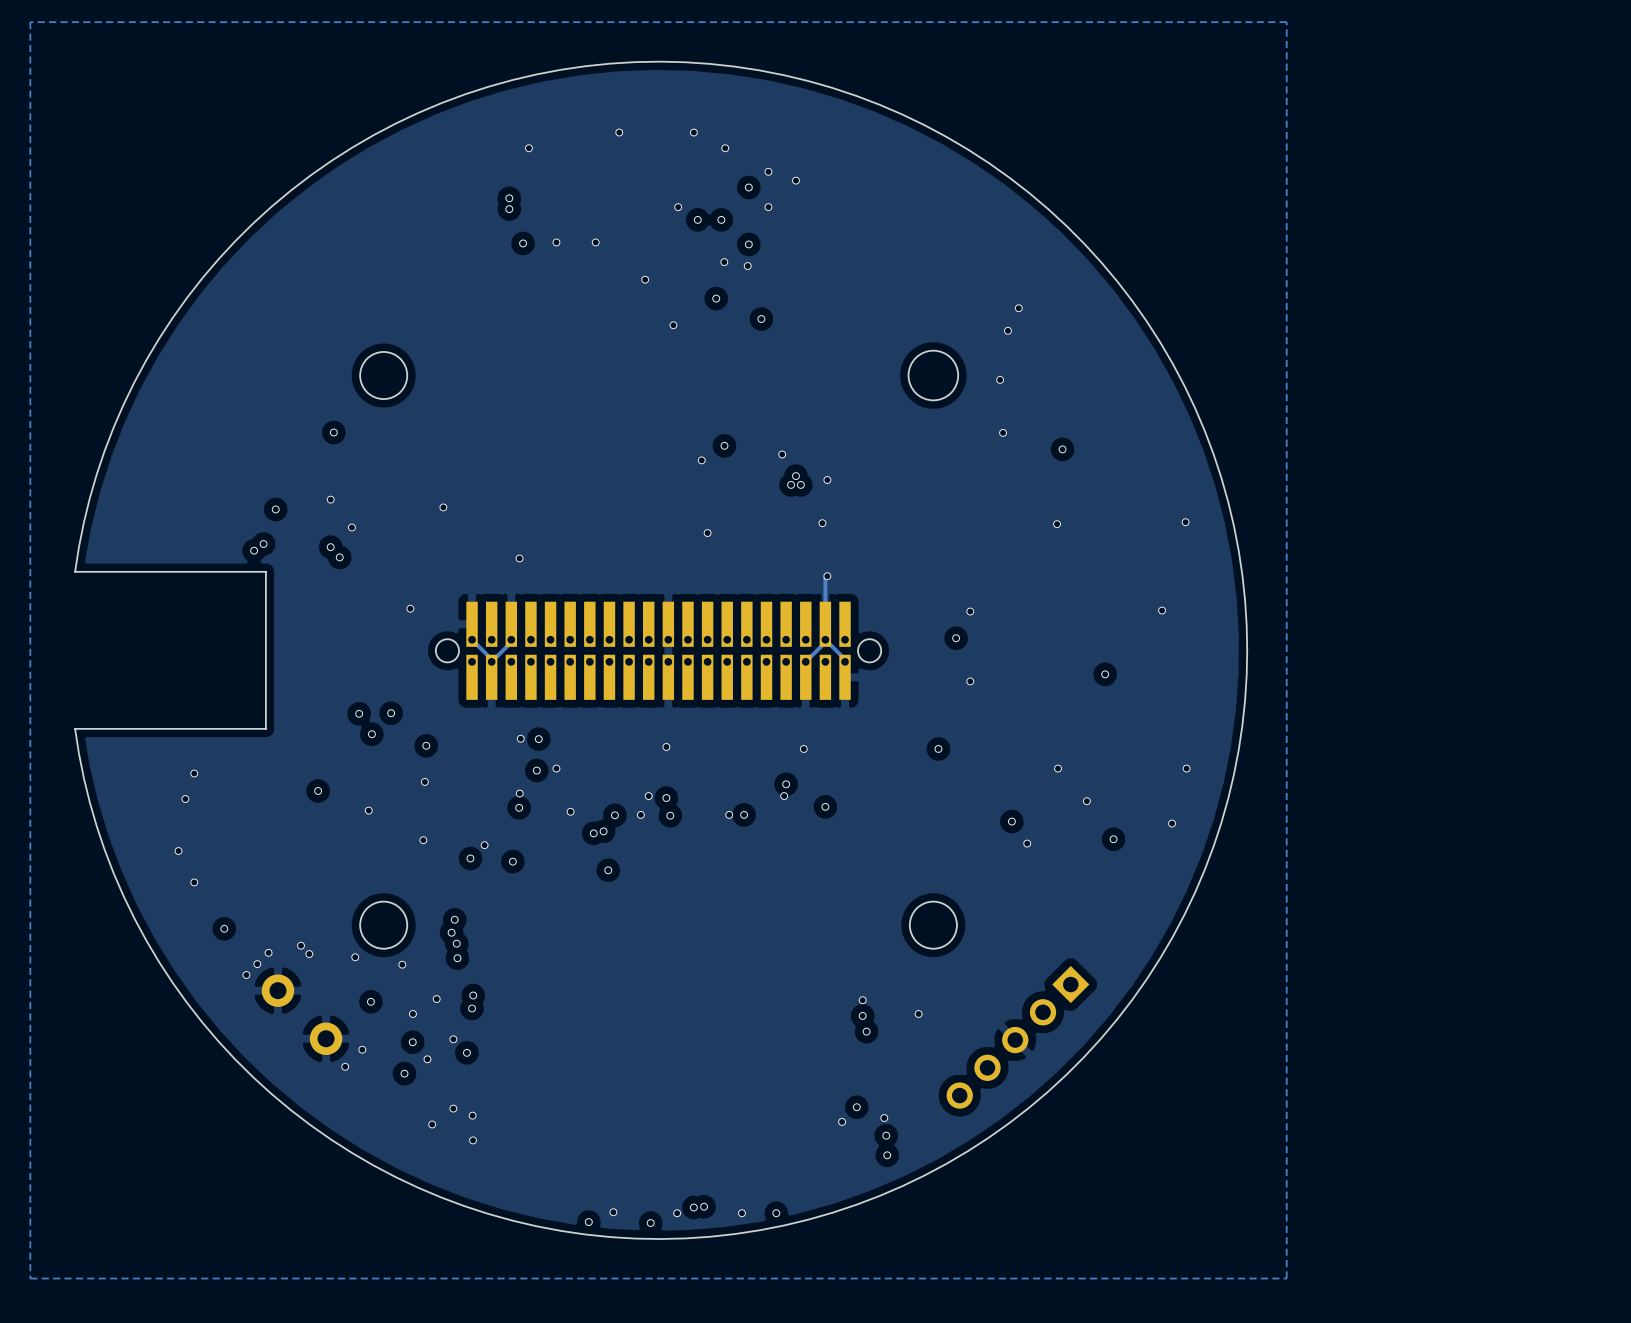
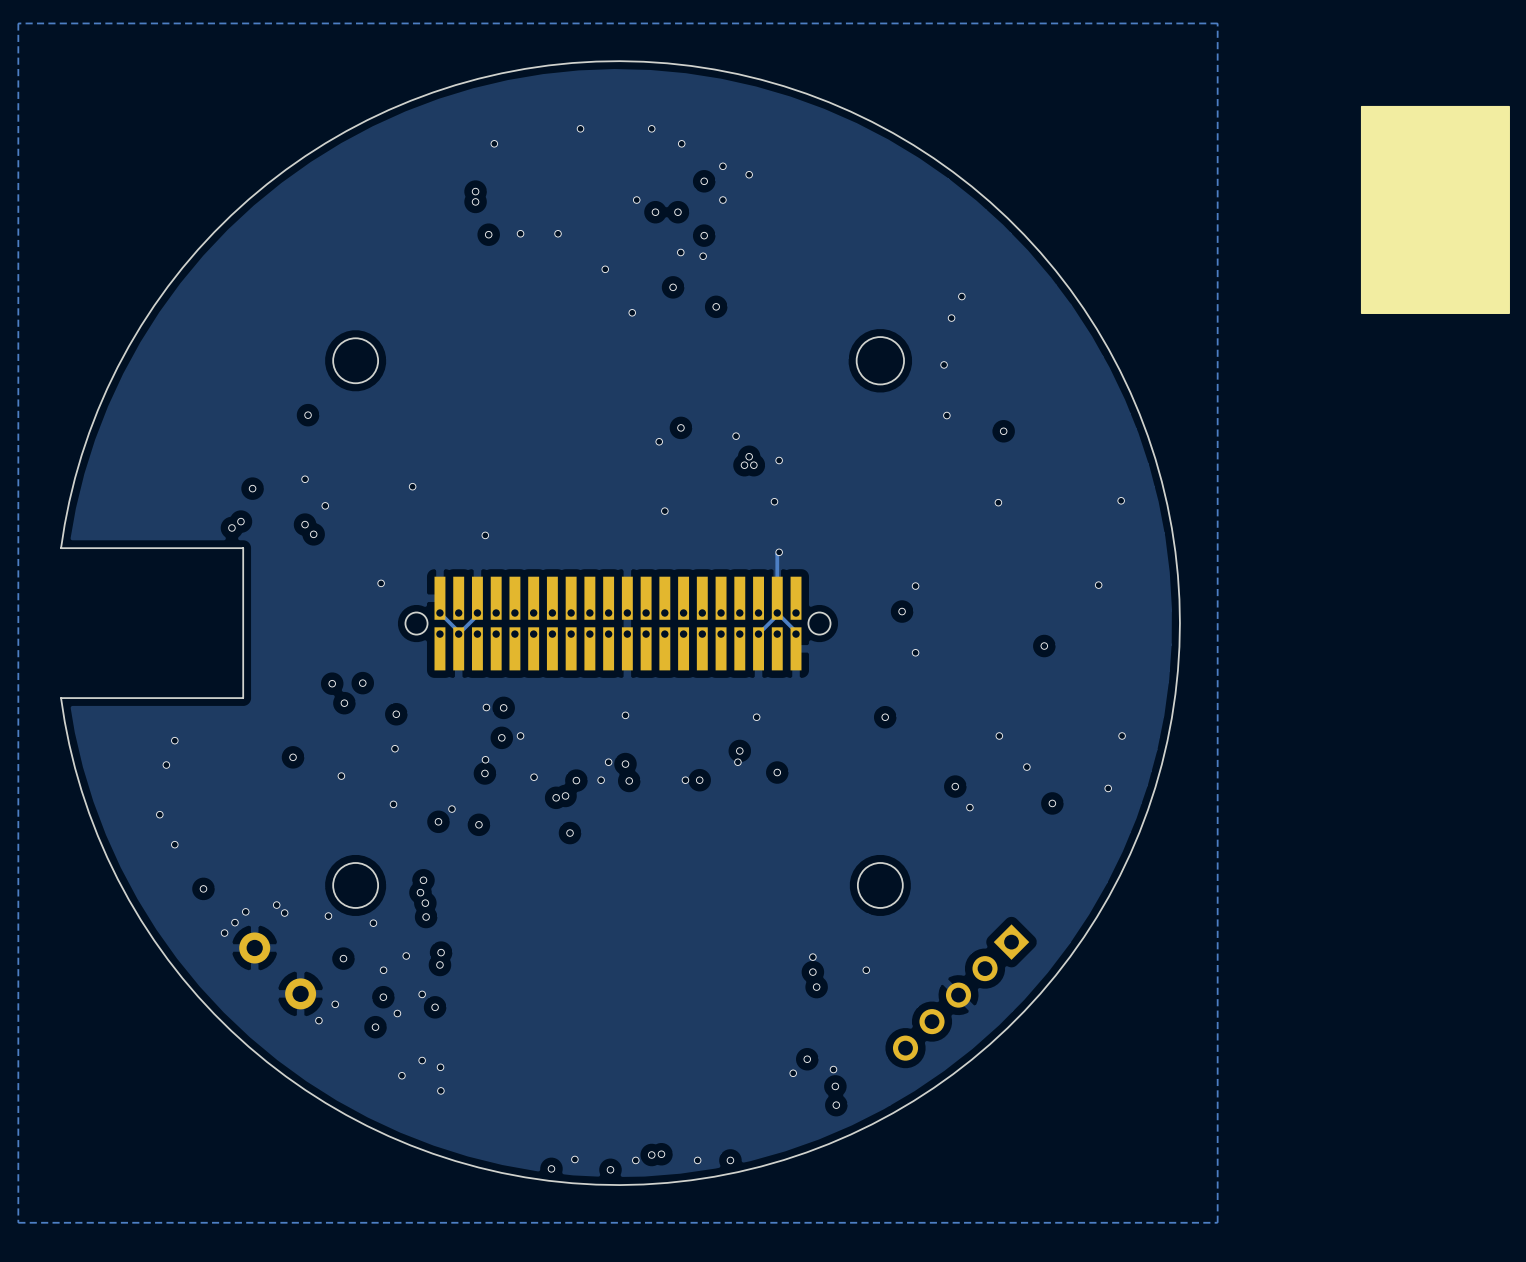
drawing: none -> [1360, 105, 1510, 314]

